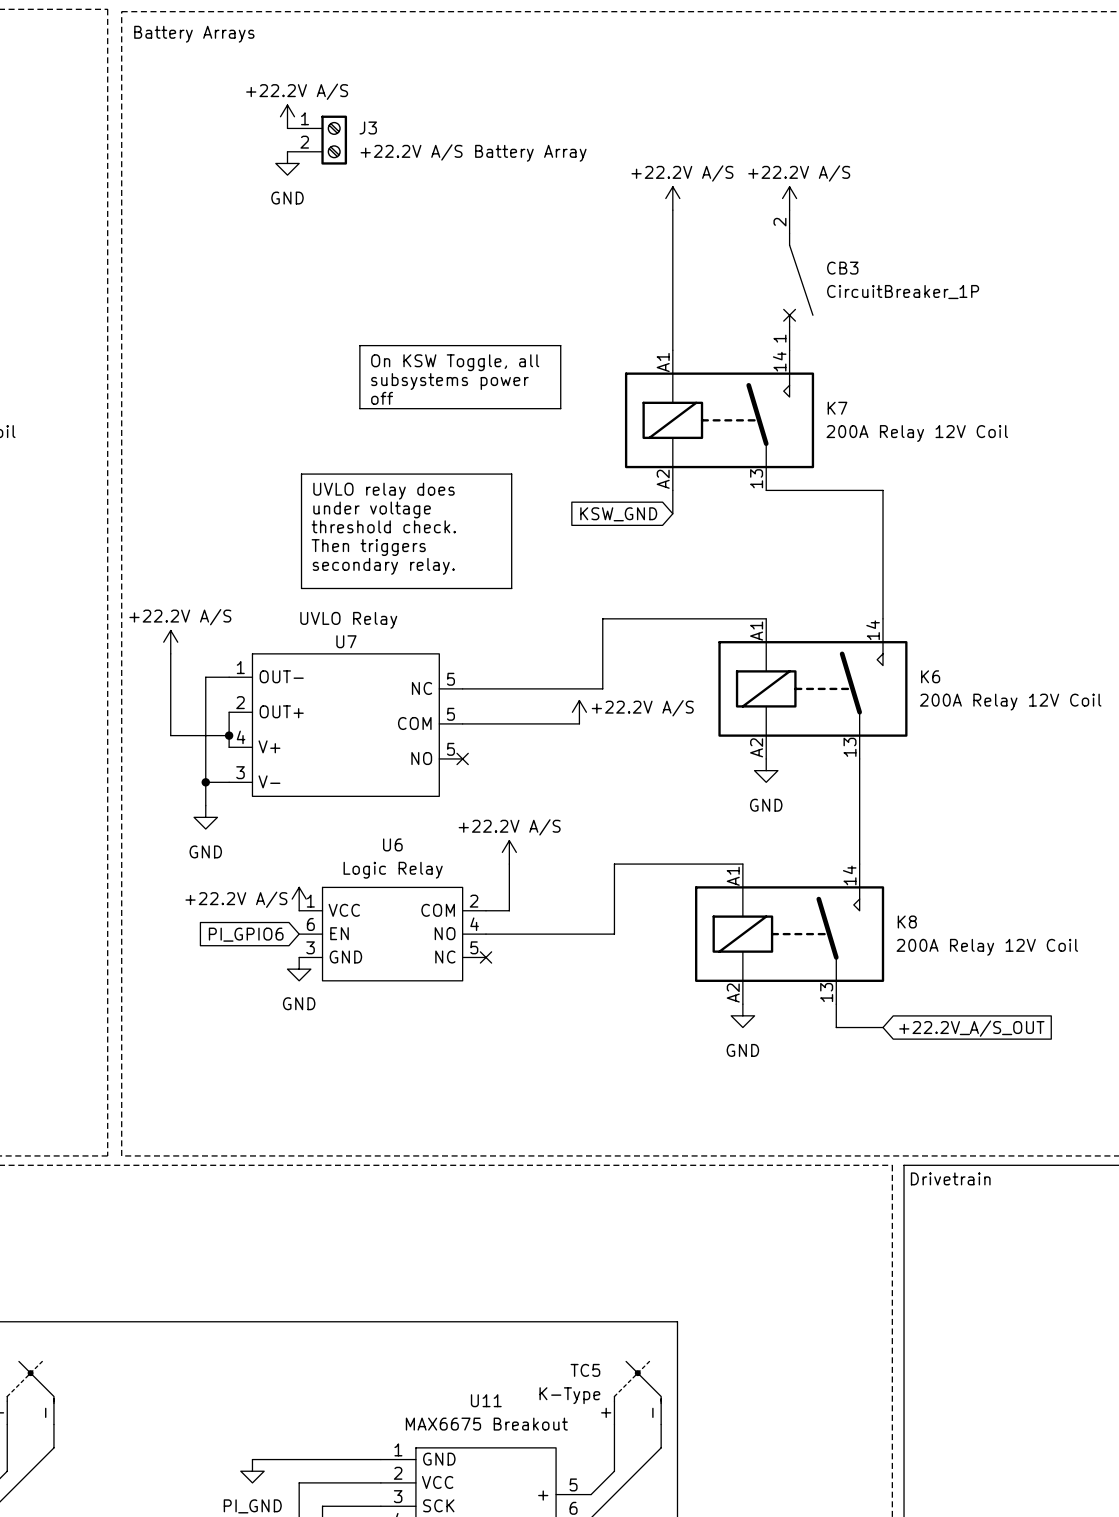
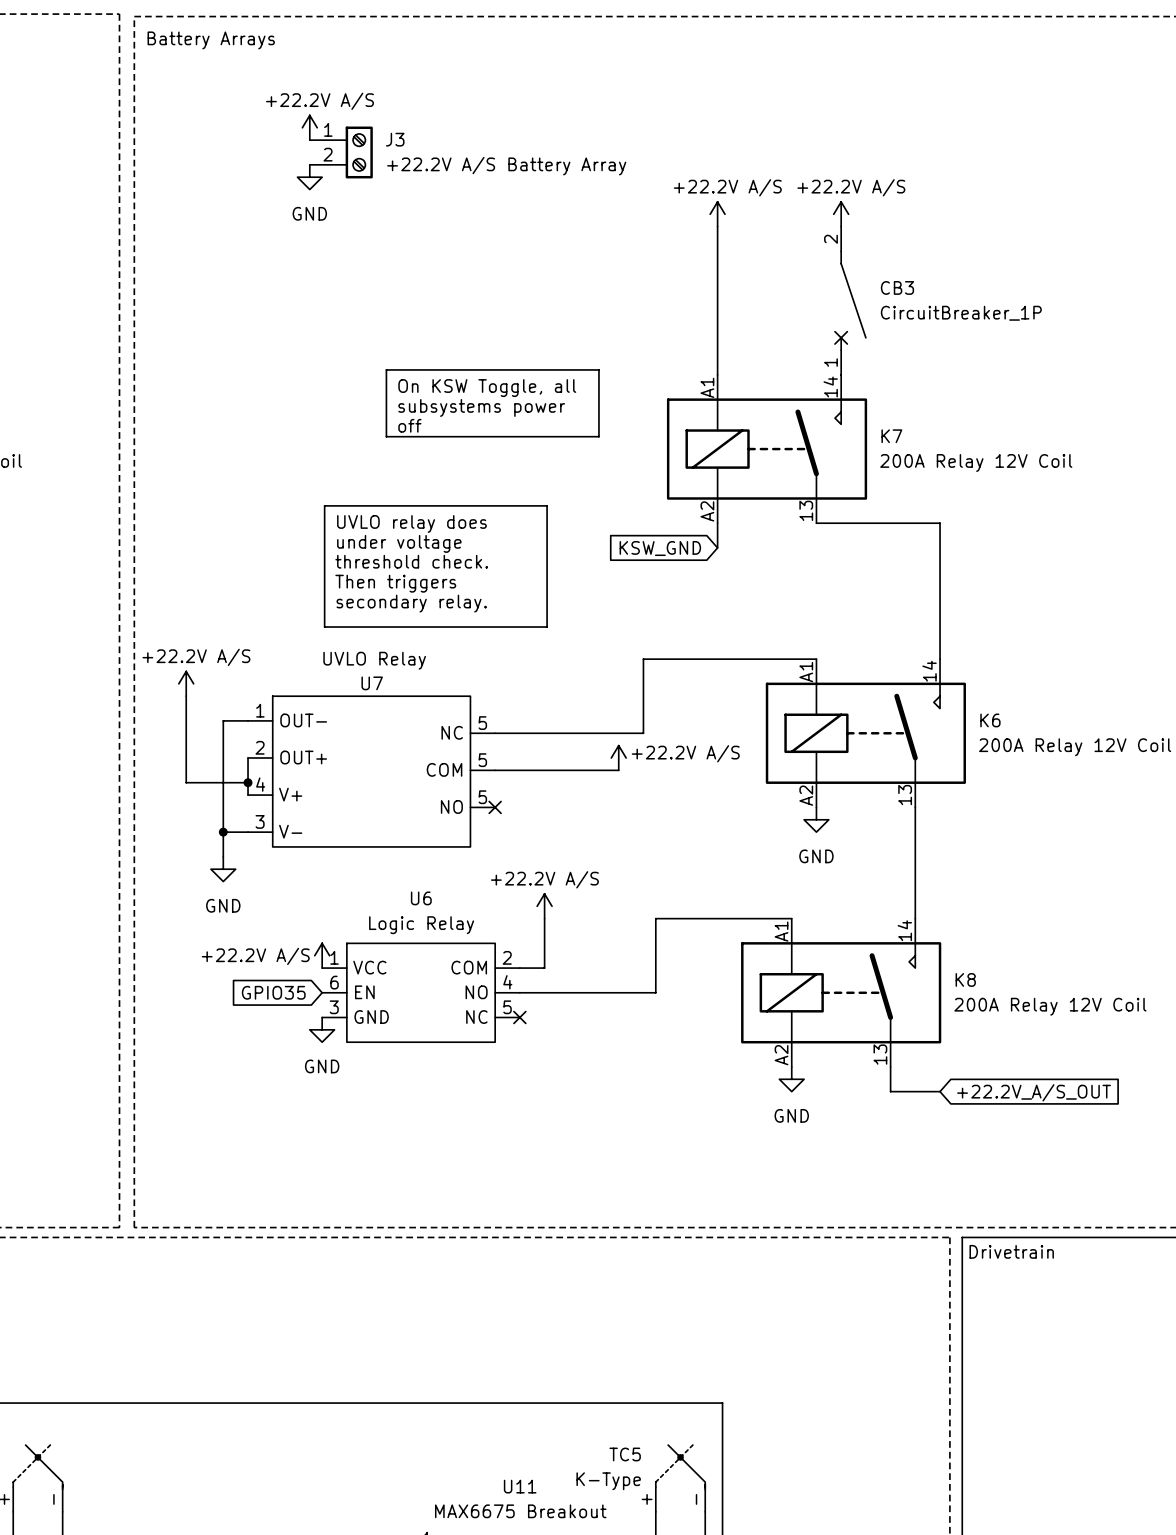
global label: PI_GPIO6 (246, 934) -> GPIO35 (273, 992)

